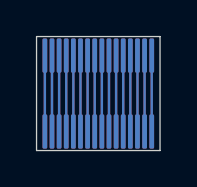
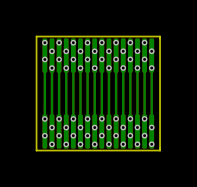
via: none -> (44, 42)
via: none -> (59, 42)
via: none -> (73, 42)
via: none -> (87, 42)
via: none -> (101, 42)
via: none -> (116, 42)
via: none -> (130, 42)
via: none -> (144, 42)
via: none -> (51, 51)
via: none -> (66, 51)
via: none -> (80, 51)
via: none -> (94, 51)
via: none -> (108, 51)
via: none -> (123, 51)
via: none -> (137, 51)
via: none -> (151, 51)
via: none -> (44, 59)
via: none -> (59, 59)
via: none -> (73, 59)
via: none -> (87, 59)
via: none -> (101, 59)
via: none -> (116, 59)
via: none -> (130, 59)
via: none -> (144, 59)
via: none -> (51, 68)
via: none -> (66, 68)
via: none -> (80, 68)
via: none -> (94, 68)
via: none -> (108, 68)
via: none -> (123, 68)
via: none -> (137, 68)
via: none -> (151, 68)
via: none -> (44, 118)
via: none -> (59, 118)
via: none -> (73, 118)
via: none -> (87, 118)
via: none -> (101, 118)
via: none -> (116, 118)
via: none -> (130, 118)
via: none -> (144, 118)
via: none -> (51, 127)
via: none -> (66, 127)
via: none -> (80, 127)
via: none -> (94, 127)
via: none -> (108, 127)
via: none -> (123, 127)
via: none -> (137, 127)
via: none -> (151, 127)
via: none -> (44, 135)
via: none -> (59, 135)
via: none -> (73, 135)
via: none -> (87, 135)
via: none -> (101, 135)
via: none -> (116, 135)
via: none -> (130, 135)
via: none -> (144, 135)
via: none -> (51, 144)
via: none -> (66, 144)
via: none -> (80, 144)
via: none -> (94, 144)
via: none -> (108, 144)
via: none -> (123, 144)
via: none -> (137, 144)
via: none -> (151, 144)

